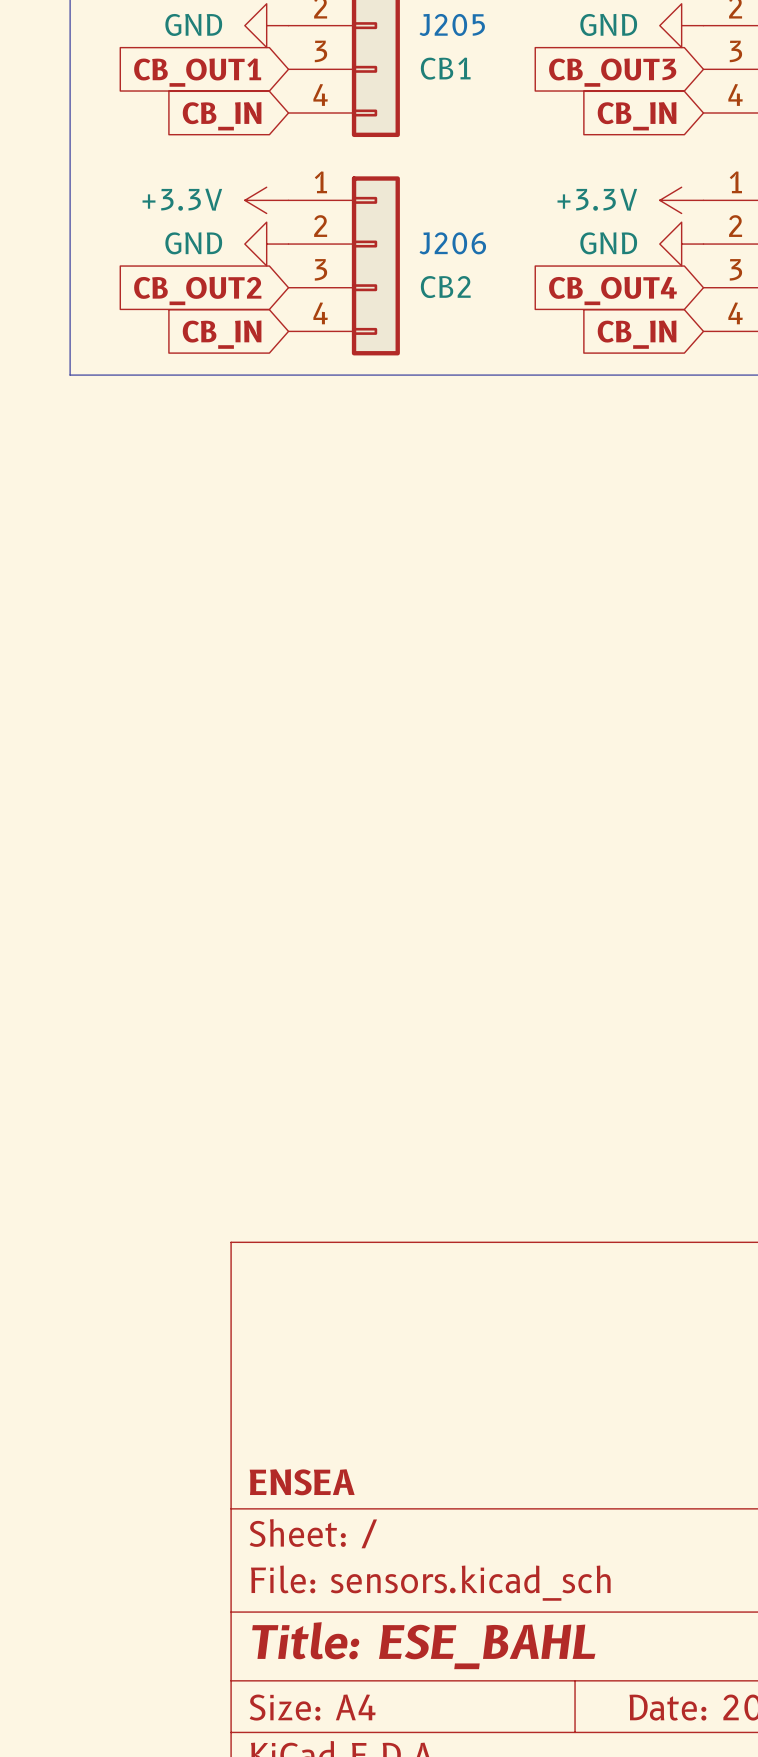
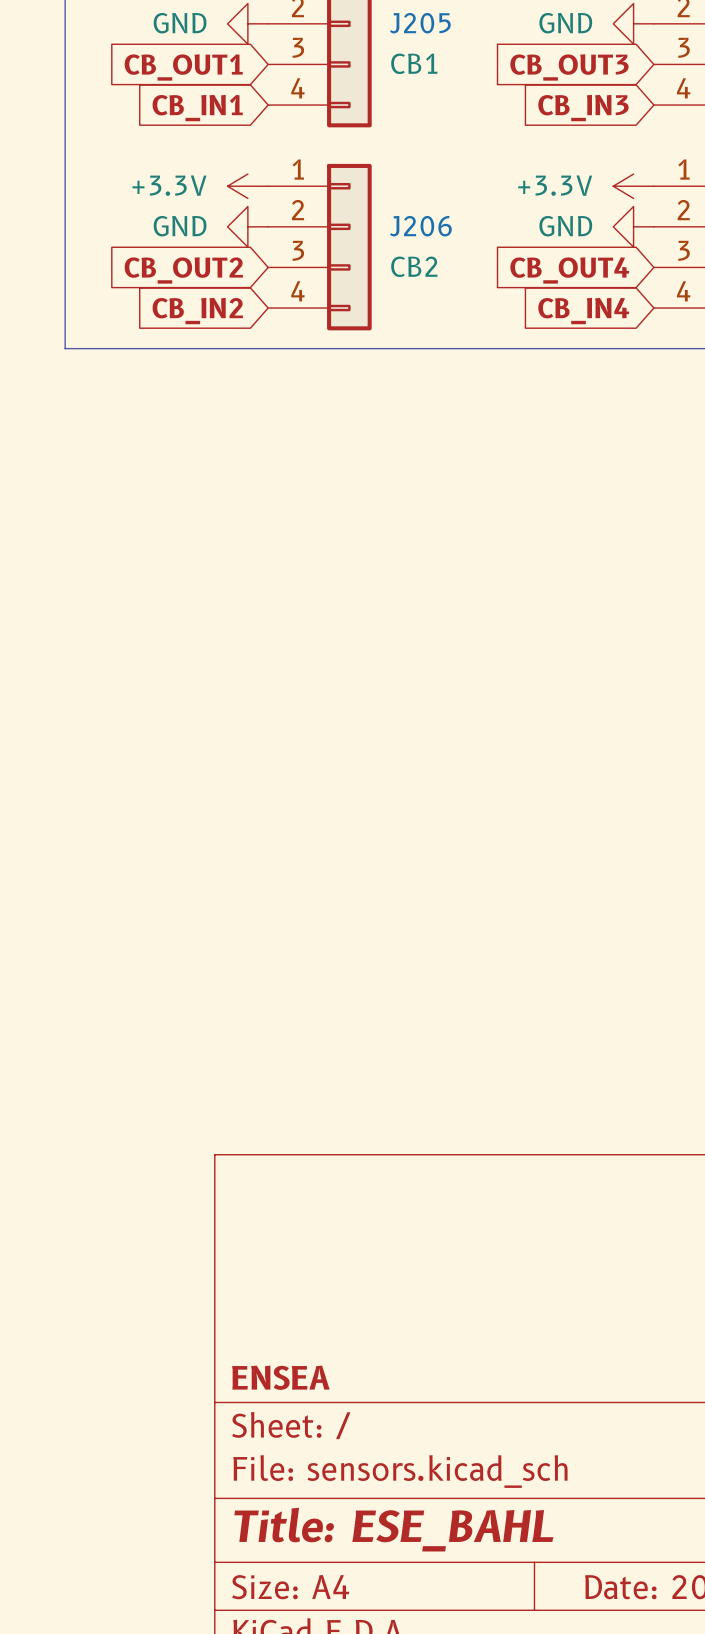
global label: CB_IN (222, 116) -> CB_IN1 (197, 108)
global label: CB_IN (637, 116) -> CB_IN3 (583, 108)
global label: CB_IN (222, 334) -> CB_IN2 (197, 311)
global label: CB_IN (637, 334) -> CB_IN4 (583, 311)

